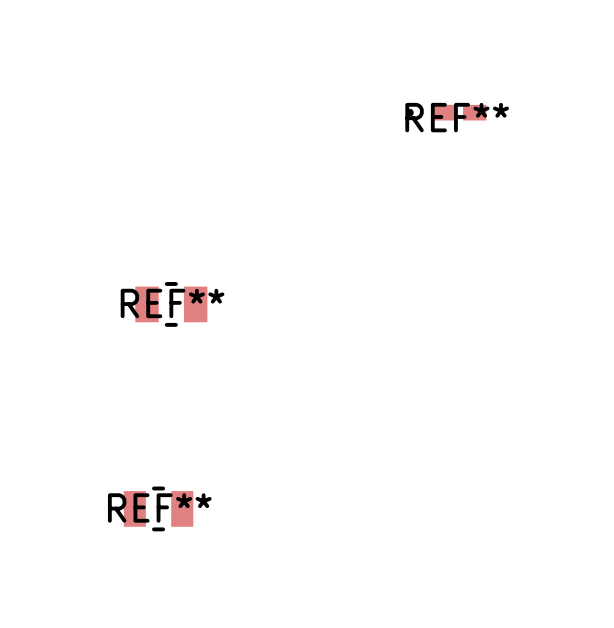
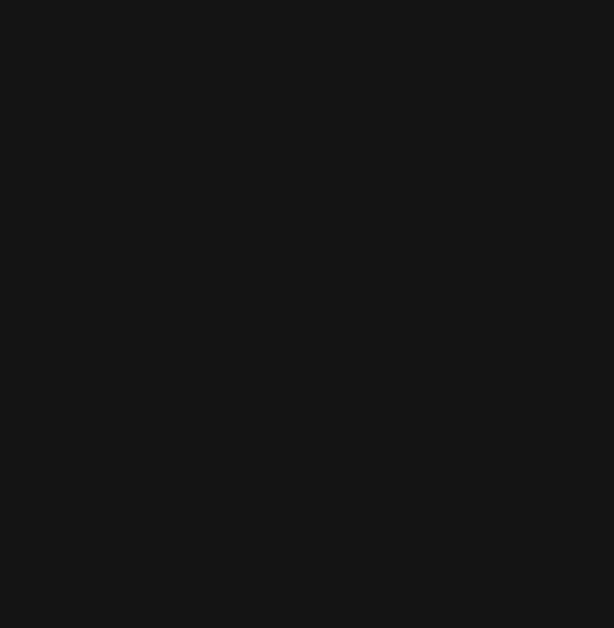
REF**: (446, 112) -> none
REF**: (171, 304) -> none
REF**: (158, 508) -> none

